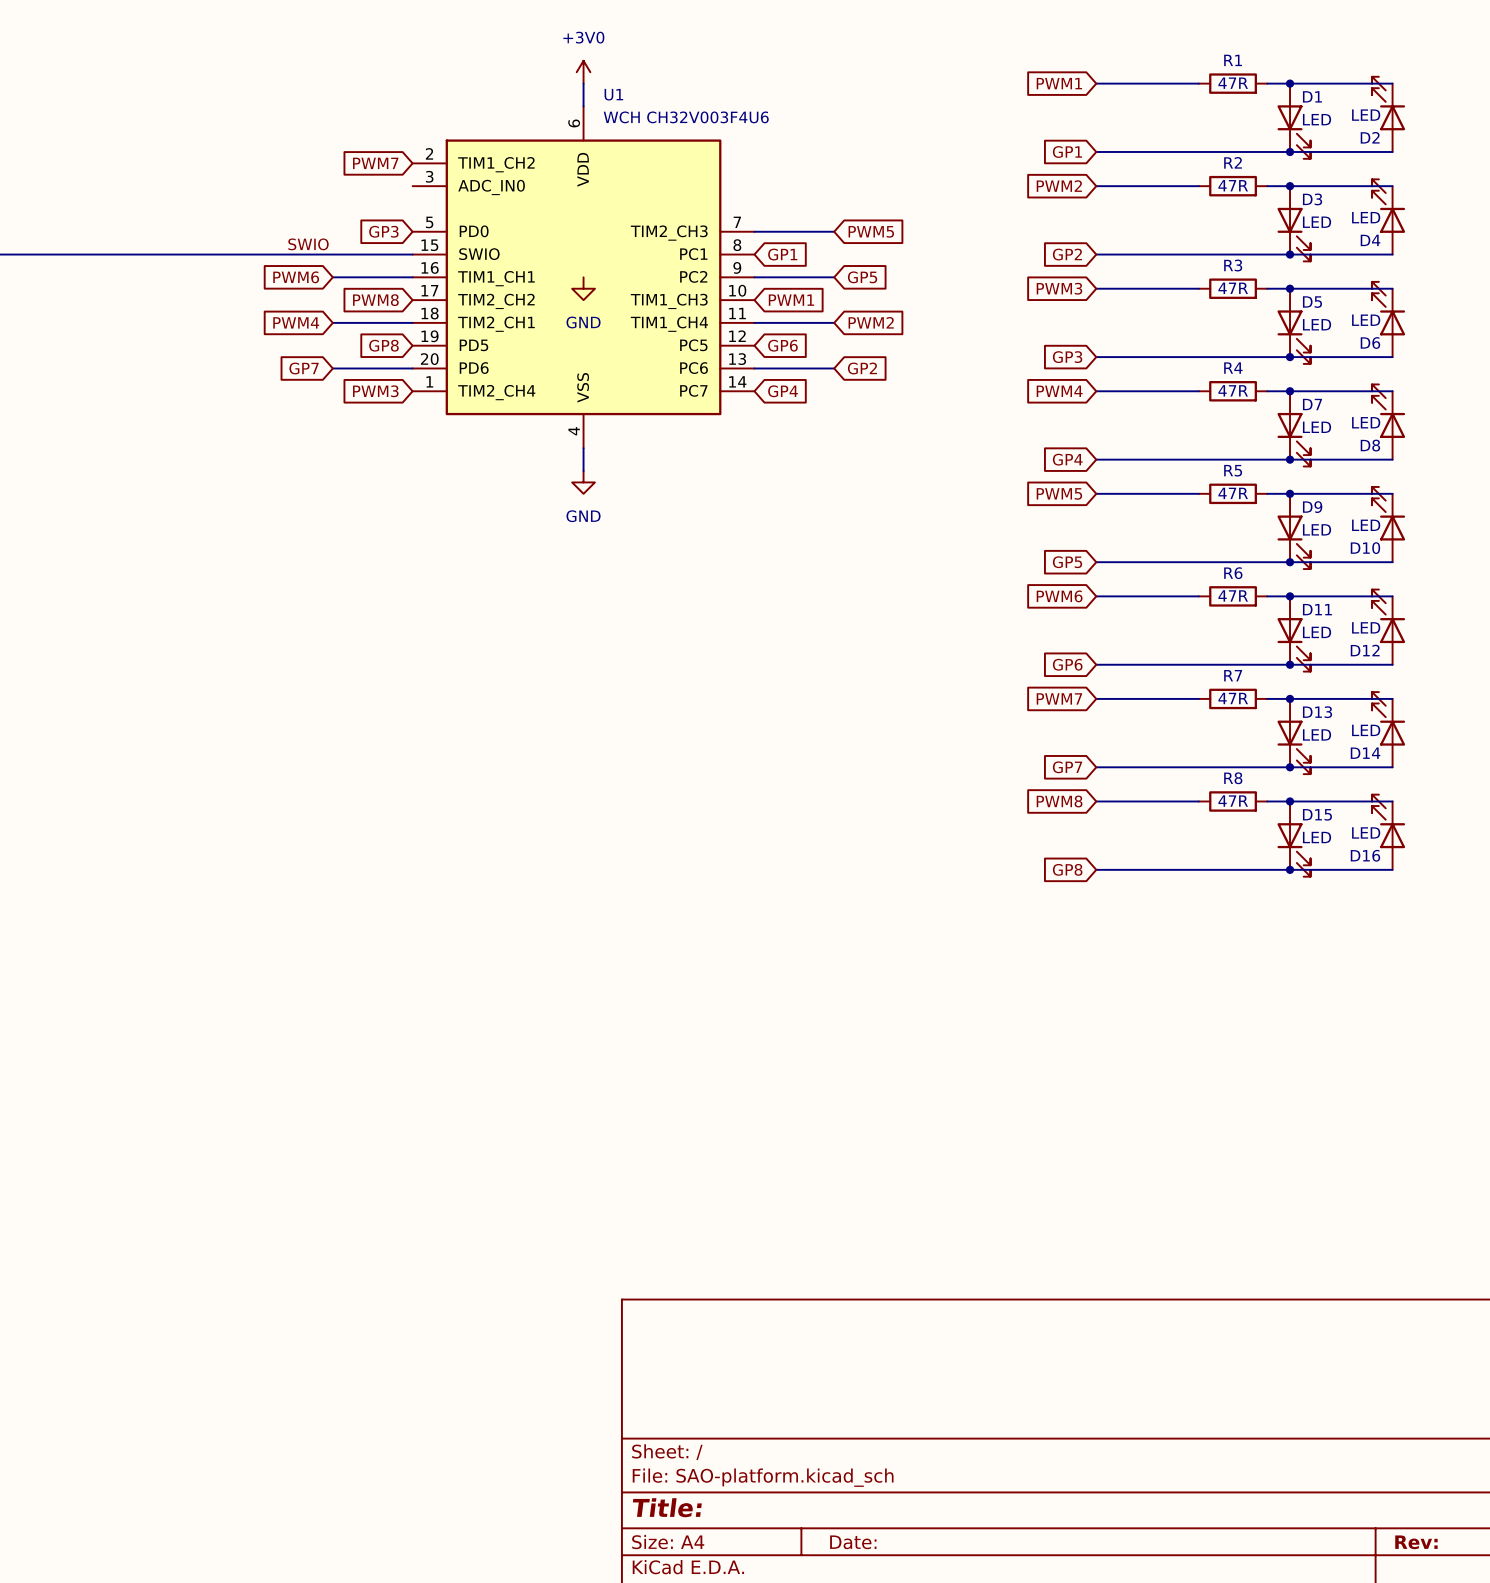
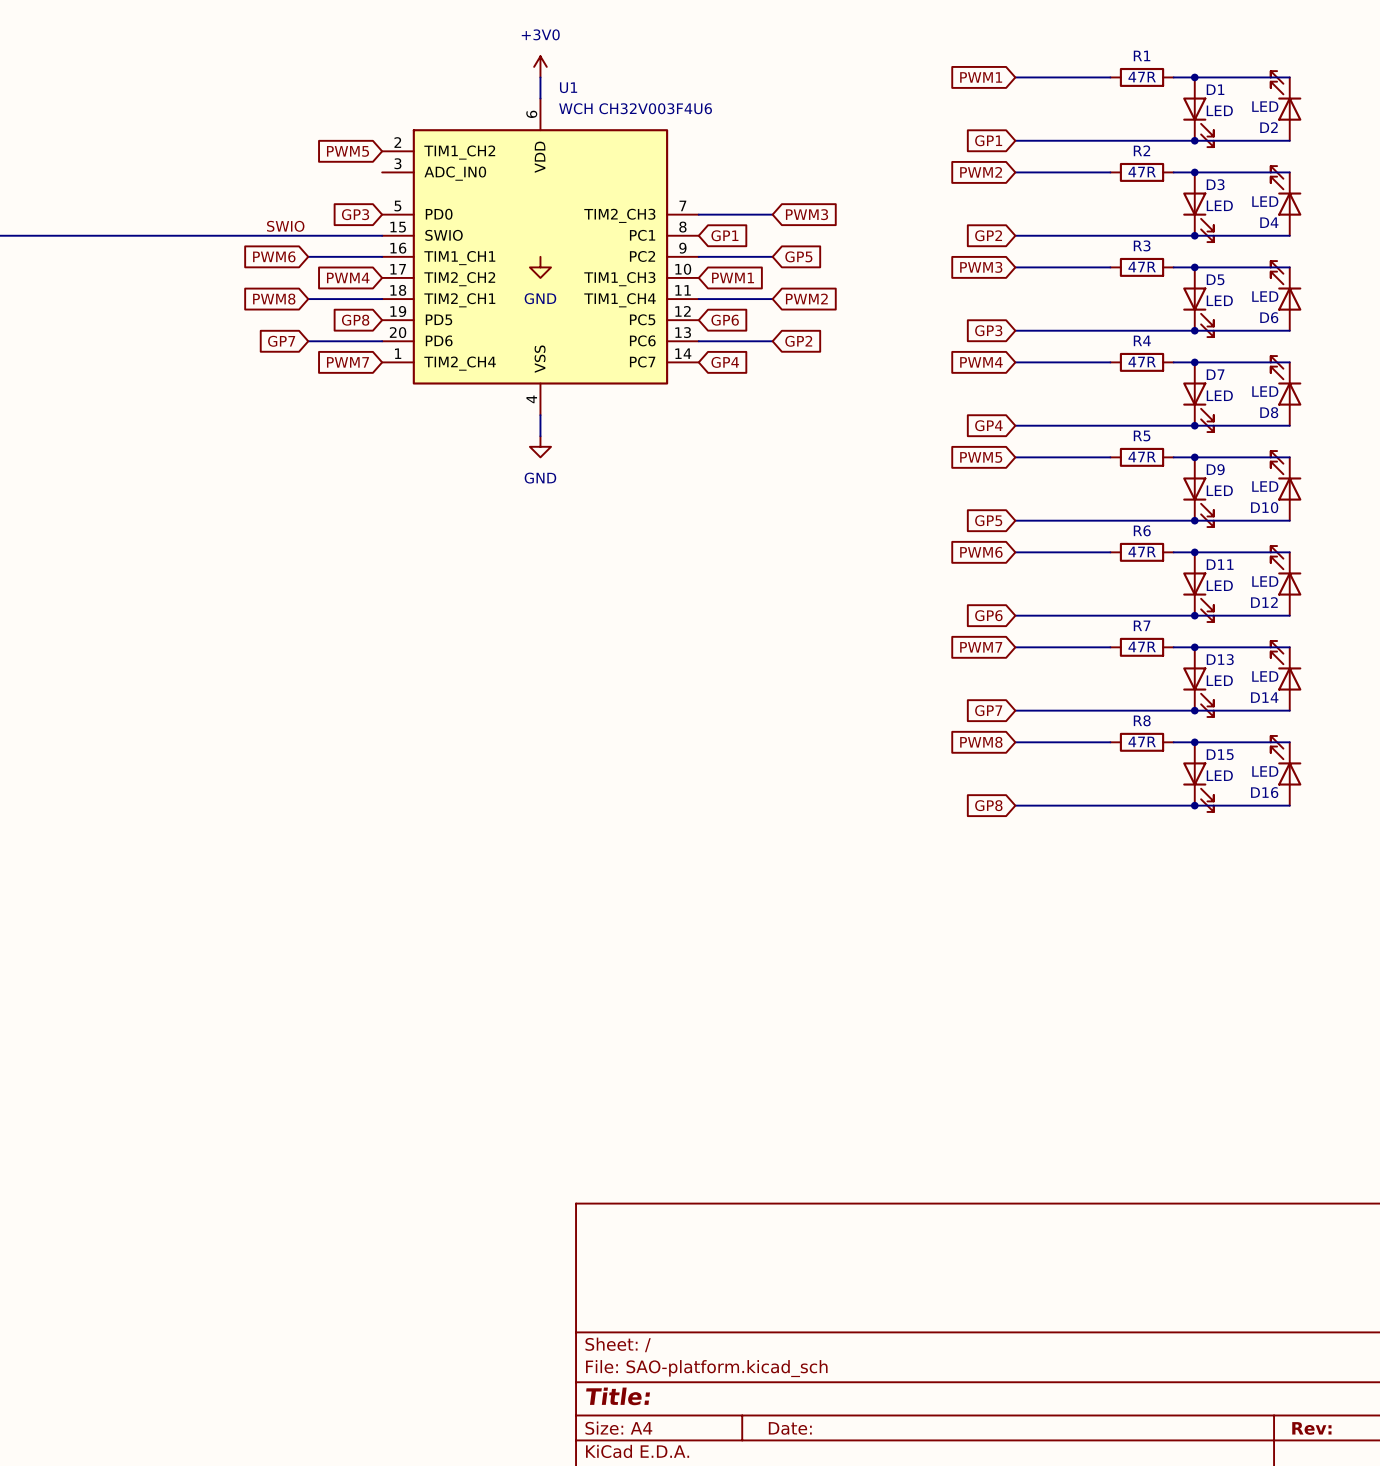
global label: PWM7 (375, 163) -> PWM5 (348, 151)
global label: PWM5 (871, 231) -> PWM3 (807, 214)
global label: PWM8 (375, 300) -> PWM4 (348, 277)
global label: PWM4 (296, 322) -> PWM8 (274, 299)
global label: PWM3 (375, 391) -> PWM7 (348, 362)

